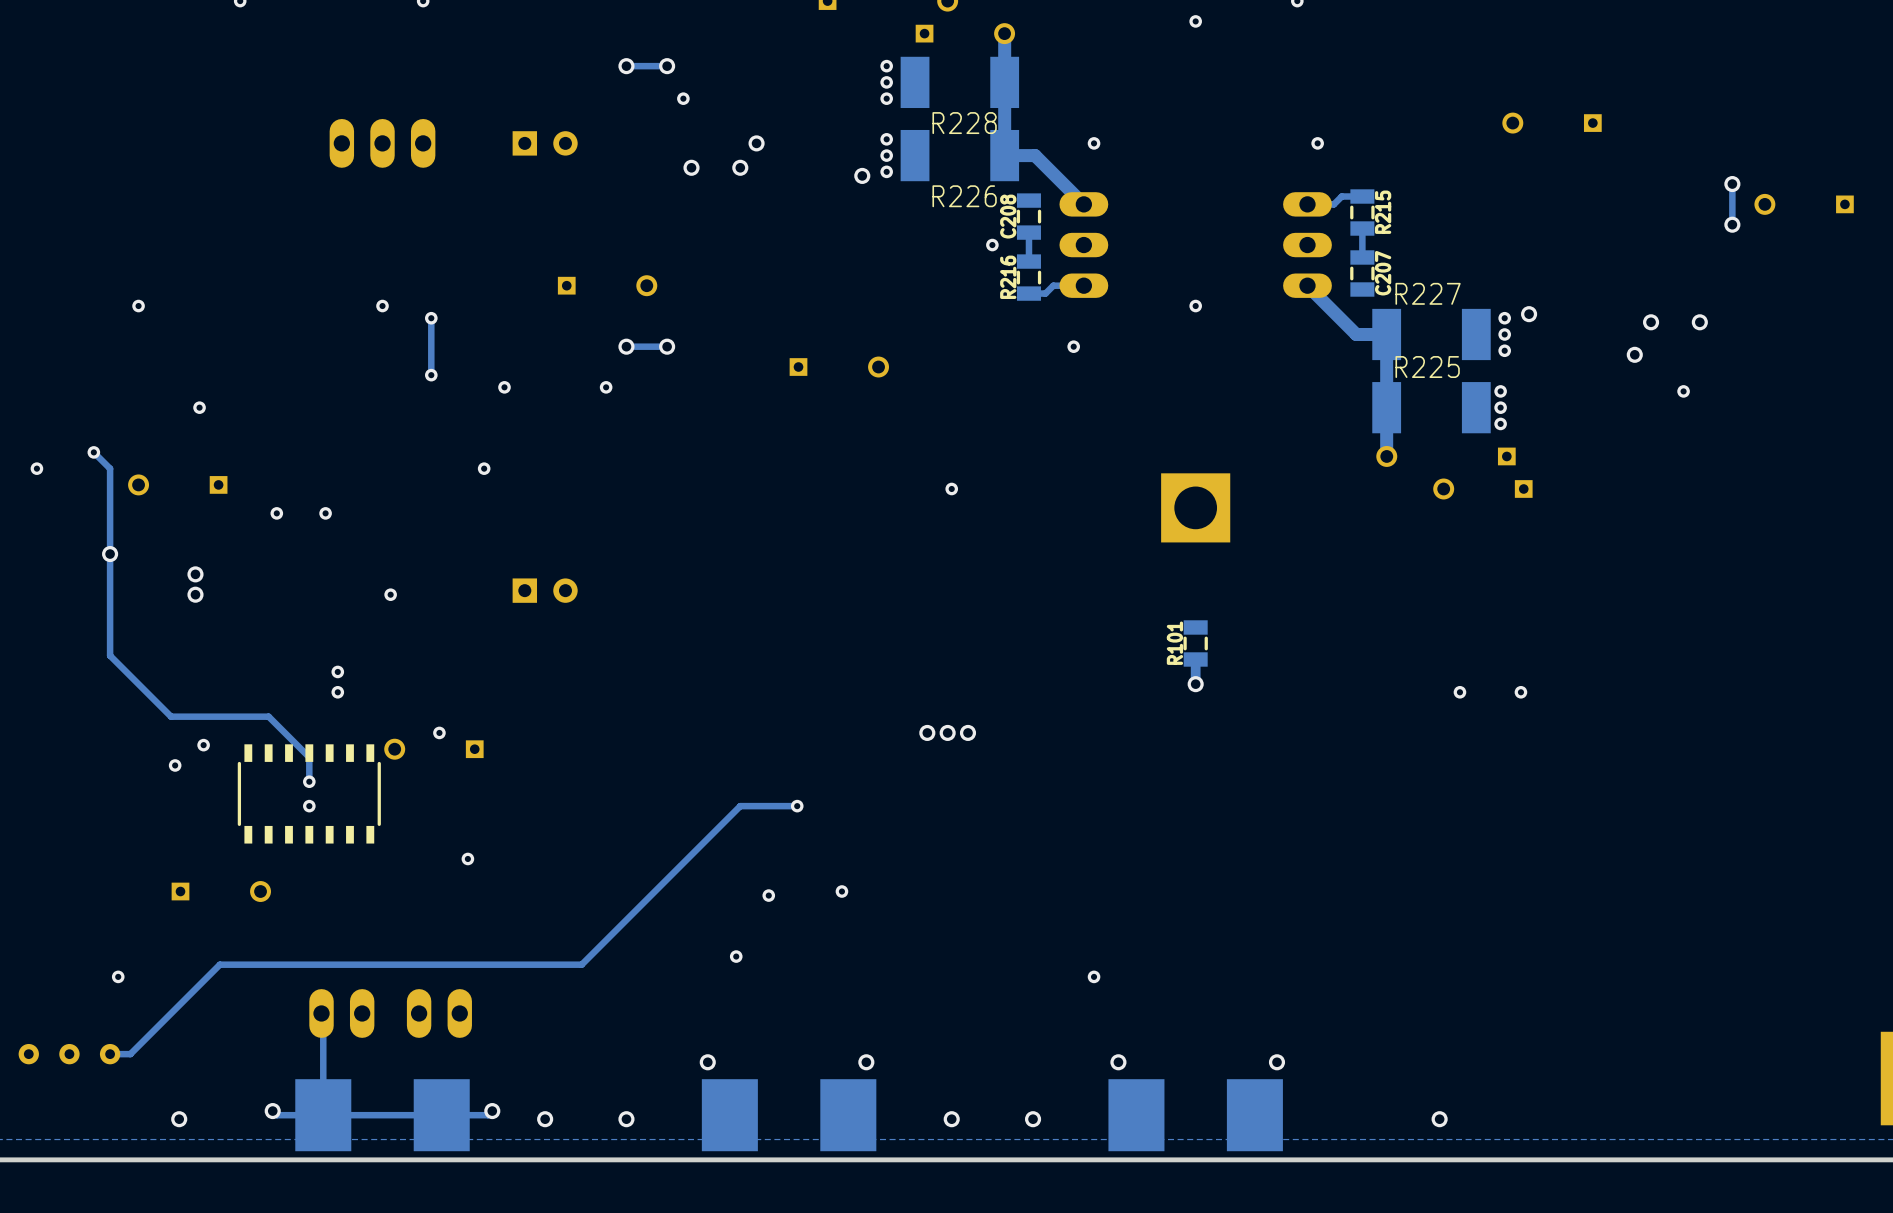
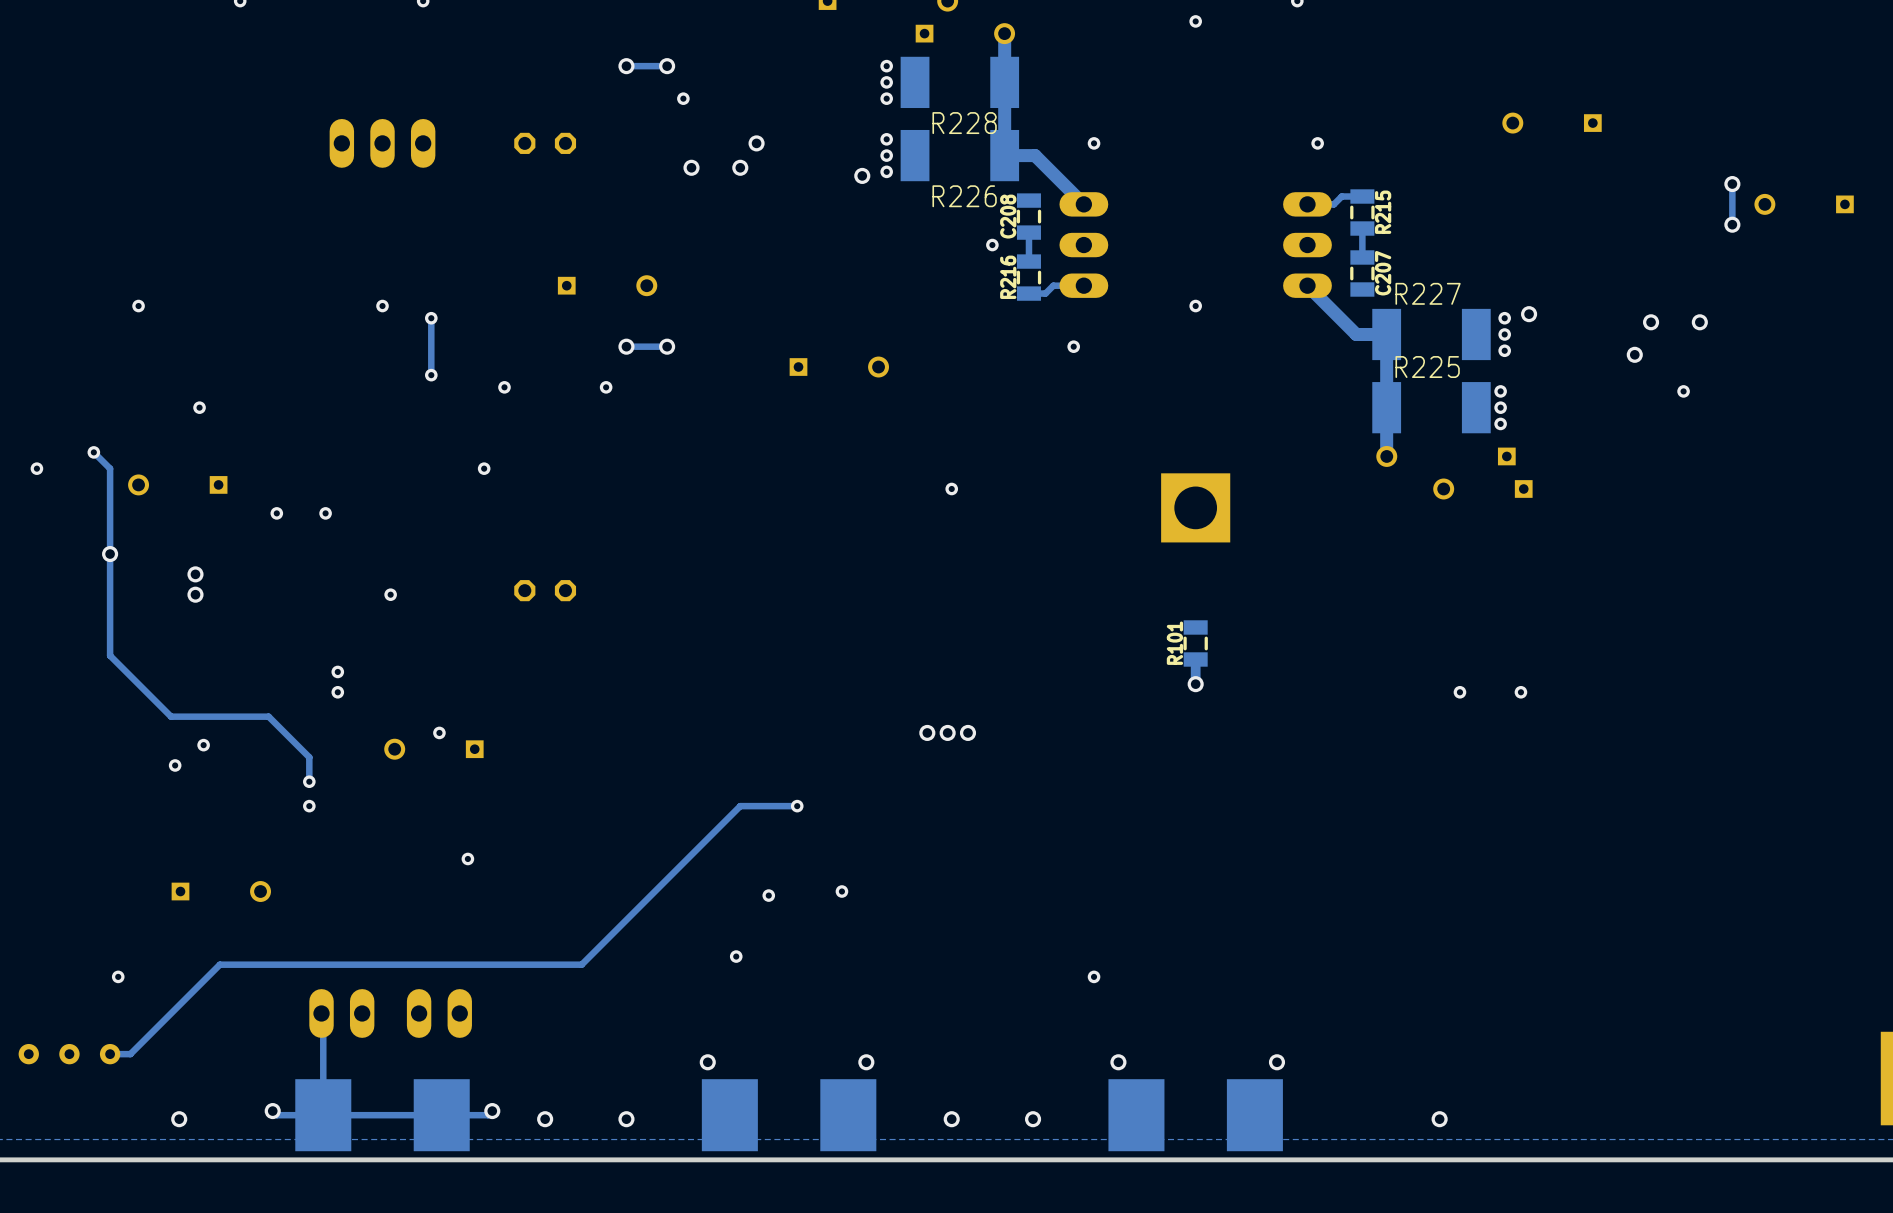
part footprint: [512, 131, 578, 156] -> [514, 132, 577, 154]
part footprint: [512, 578, 578, 603] -> [514, 580, 577, 602]
part: (309, 793) -> none

